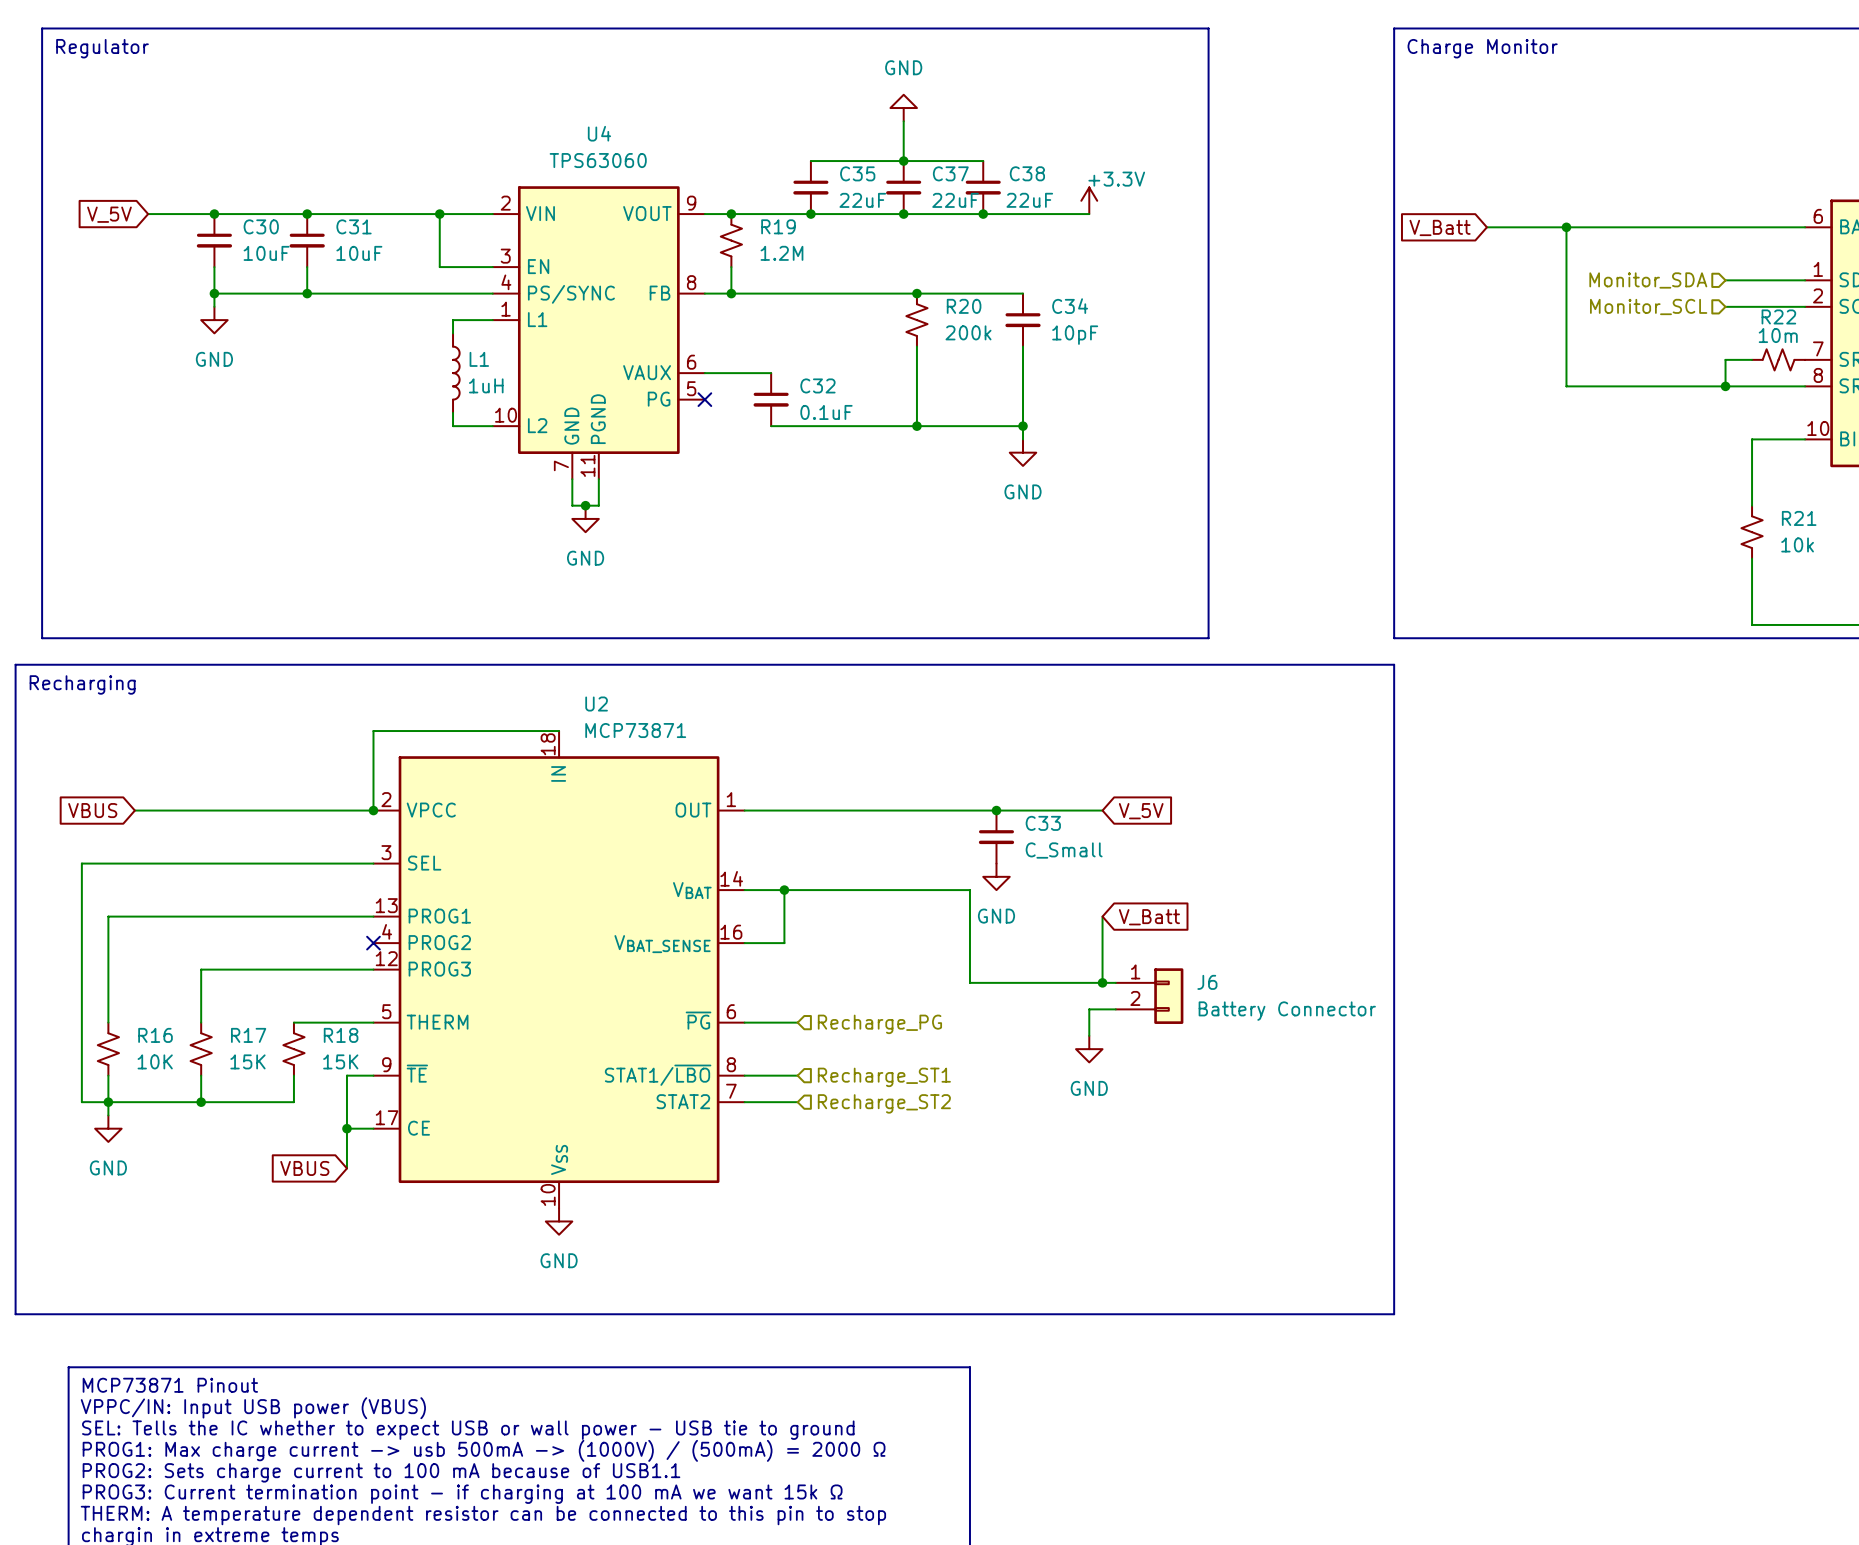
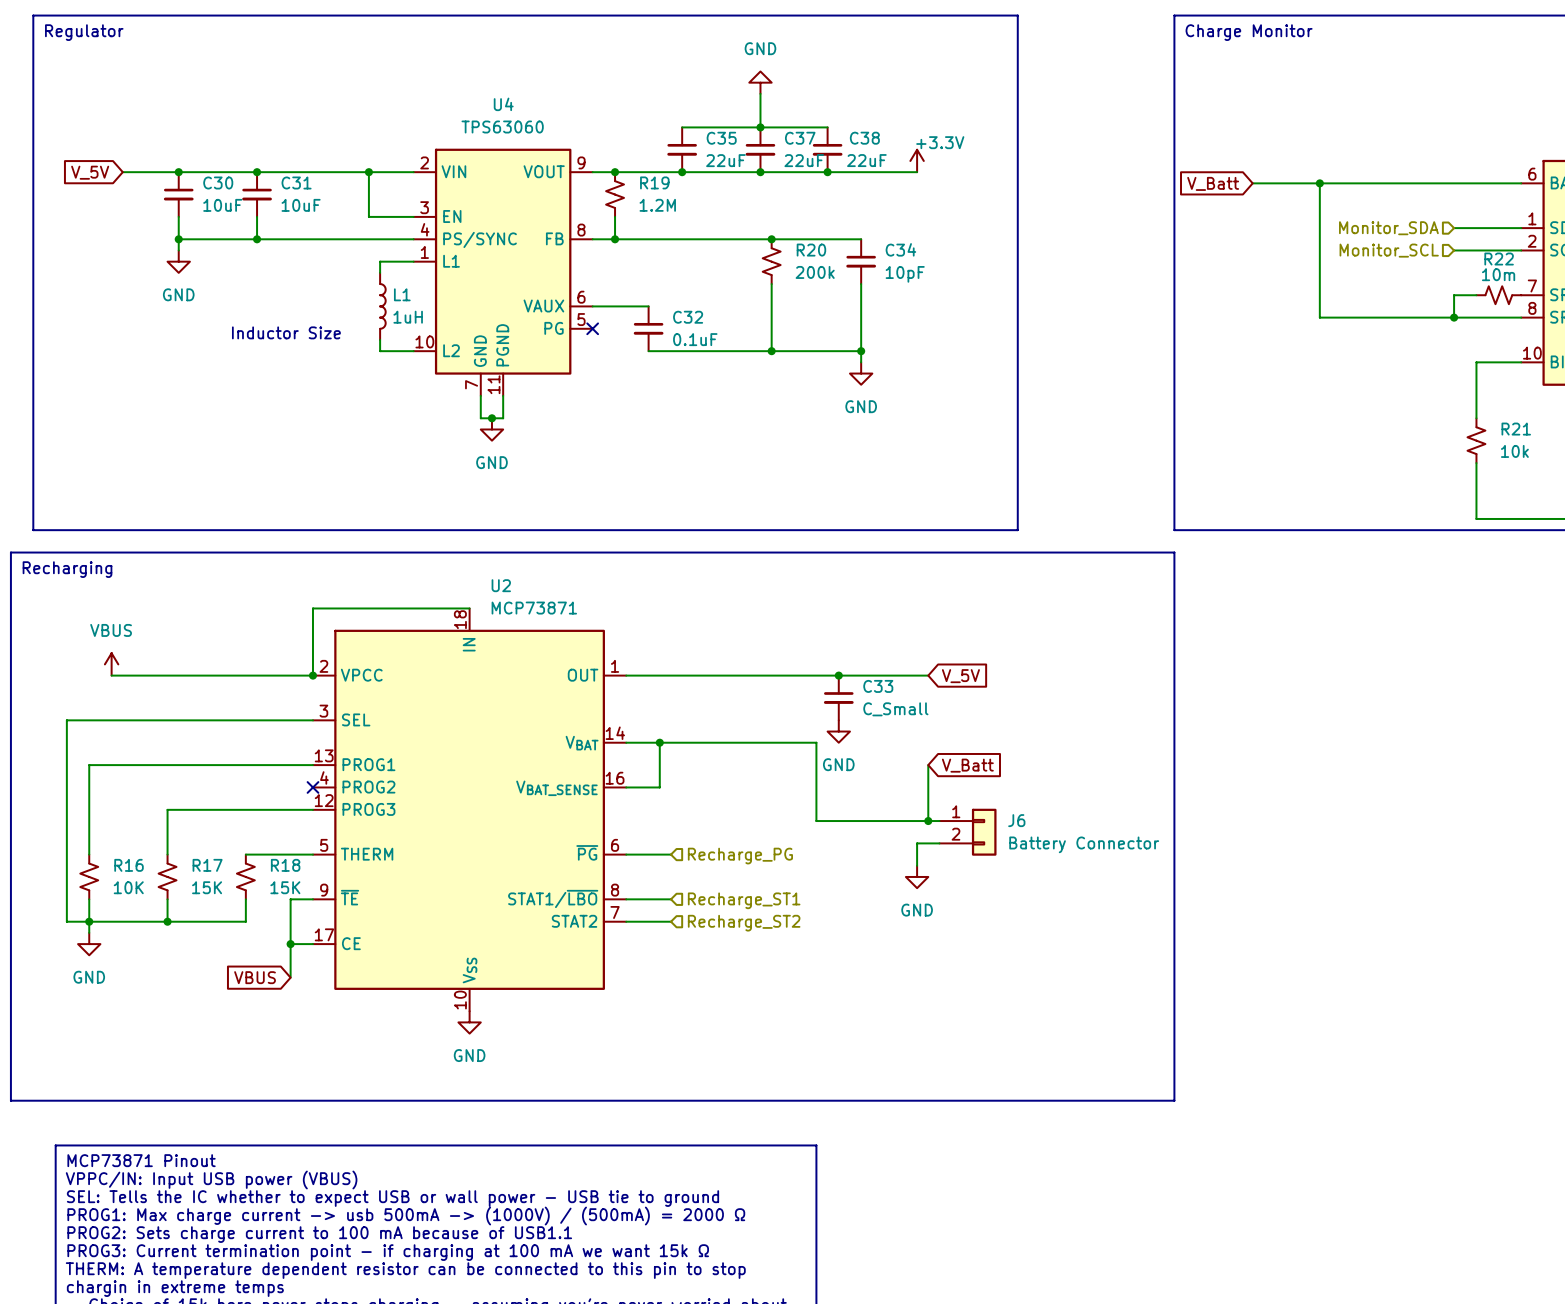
text: none -> Inductor Size (286, 332)
power symbol: none -> VBUS (111, 664)
global label: VBUS (92, 810) -> none

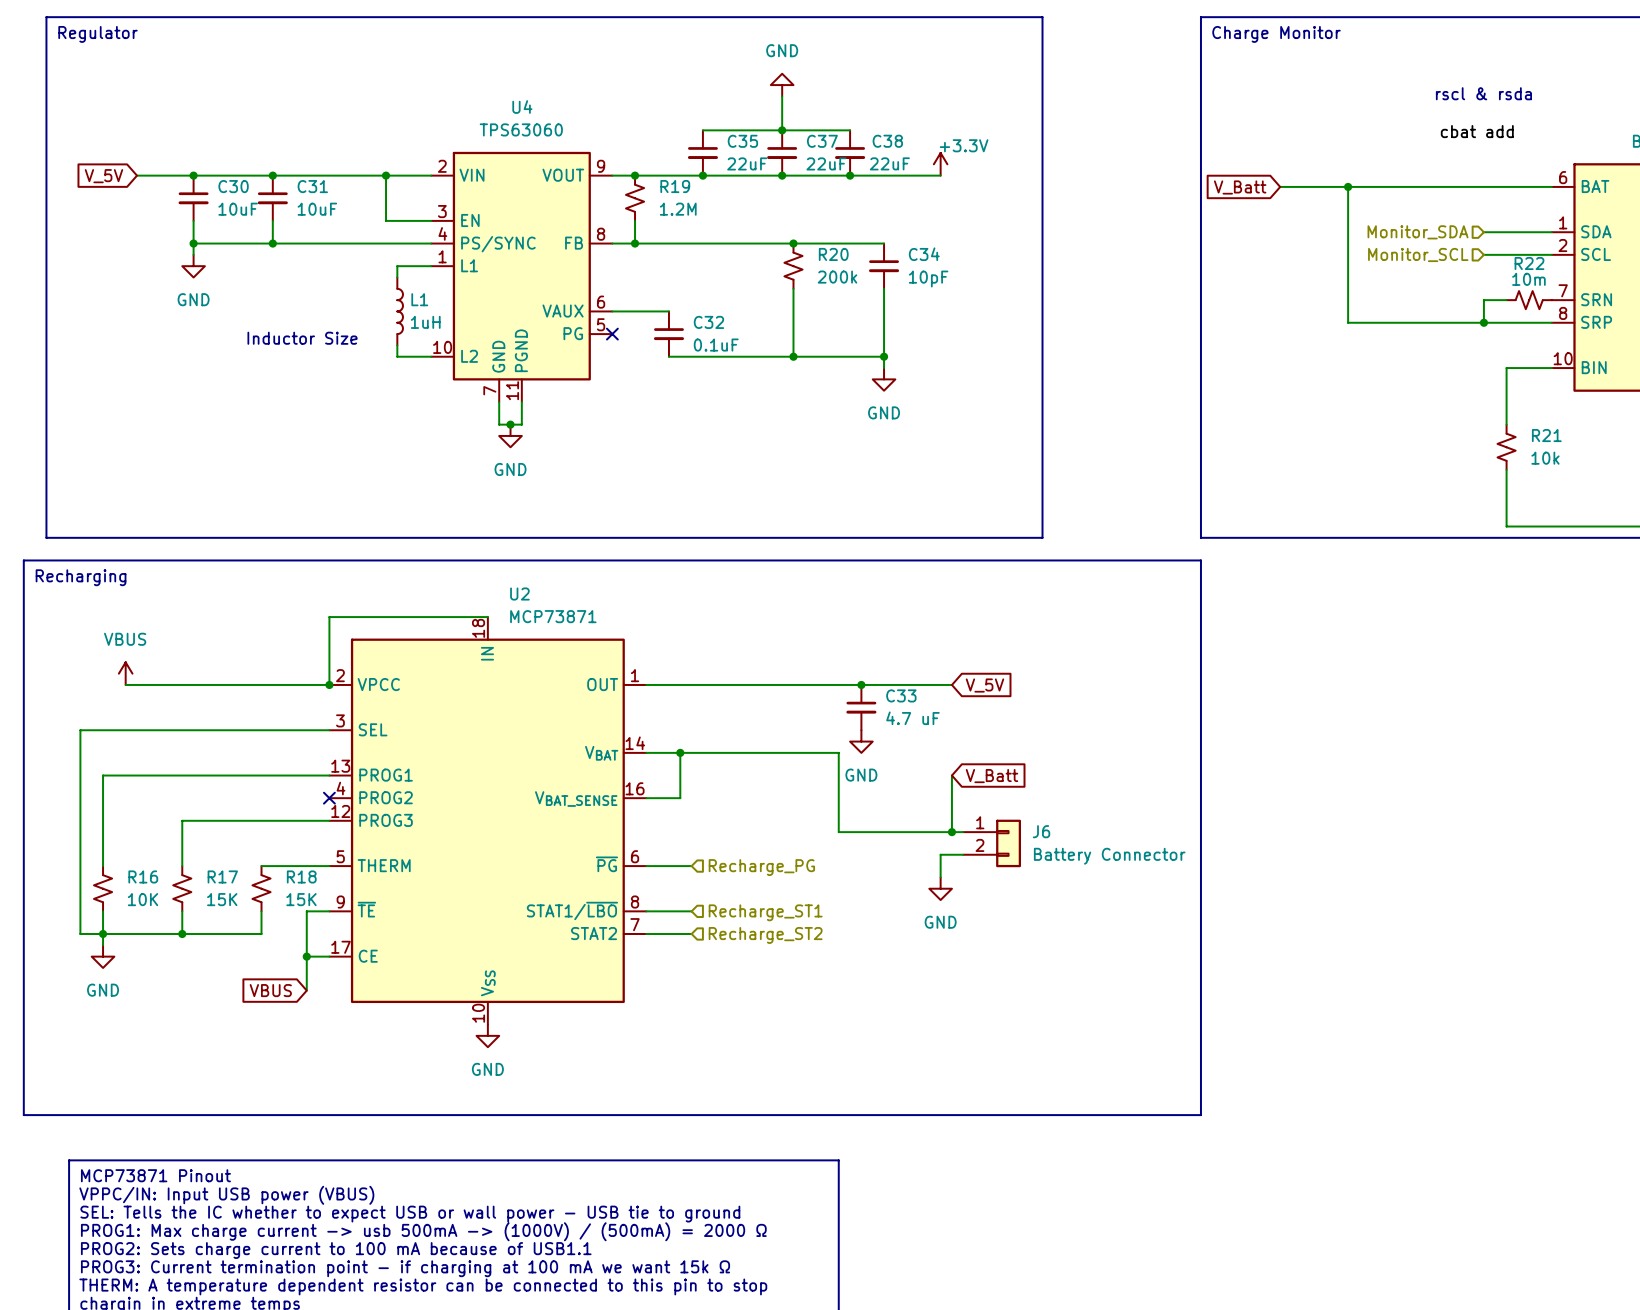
text: none -> rscl & rsda (1483, 93)
label: none -> cbat add (1477, 131)
C33 value: C_Small (895, 709) -> 4.7 uF (912, 718)

